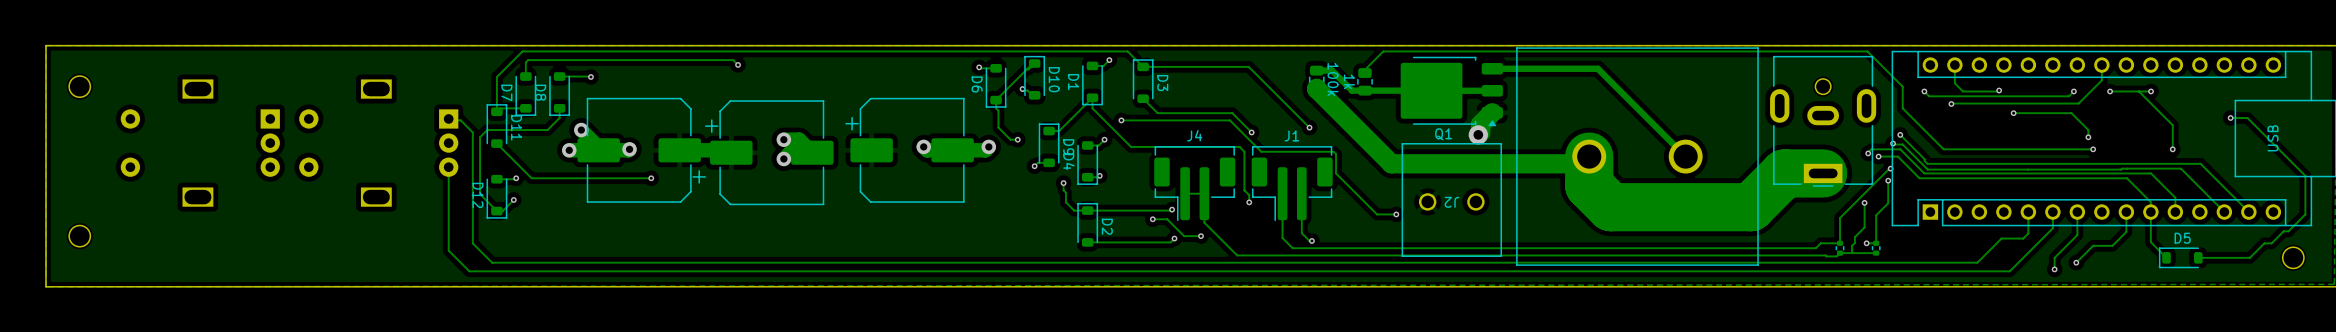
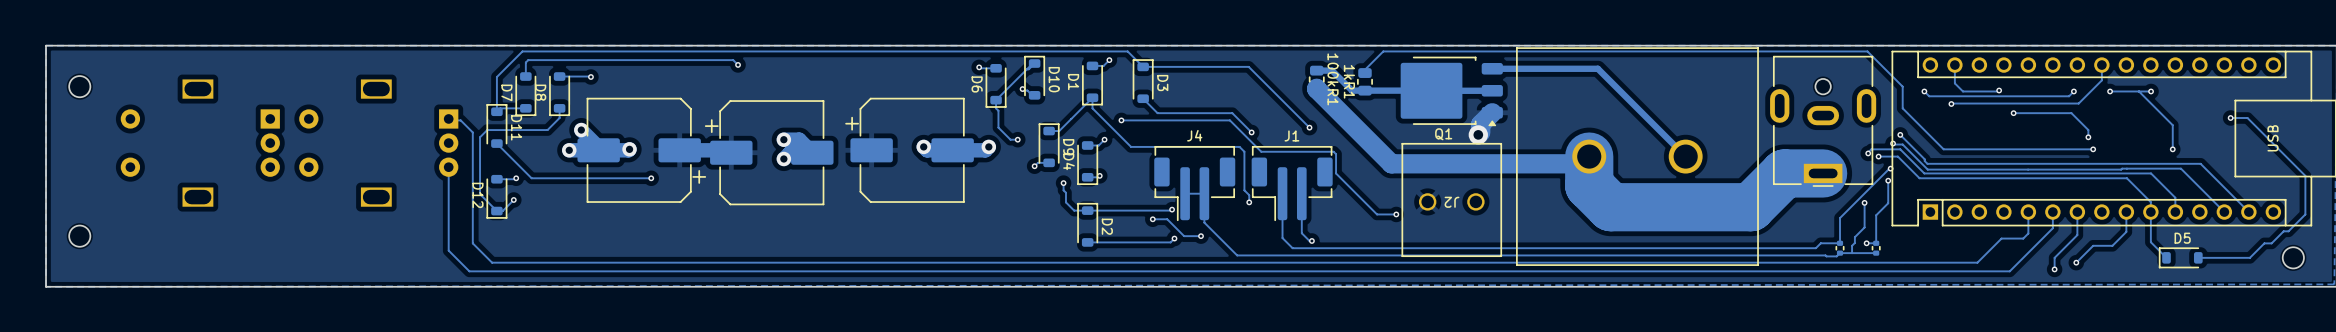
100k name: 100k (1333, 79) -> 100kR1 (1333, 79)
1k name: 1k (1349, 81) -> 1kR1 (1349, 81)

